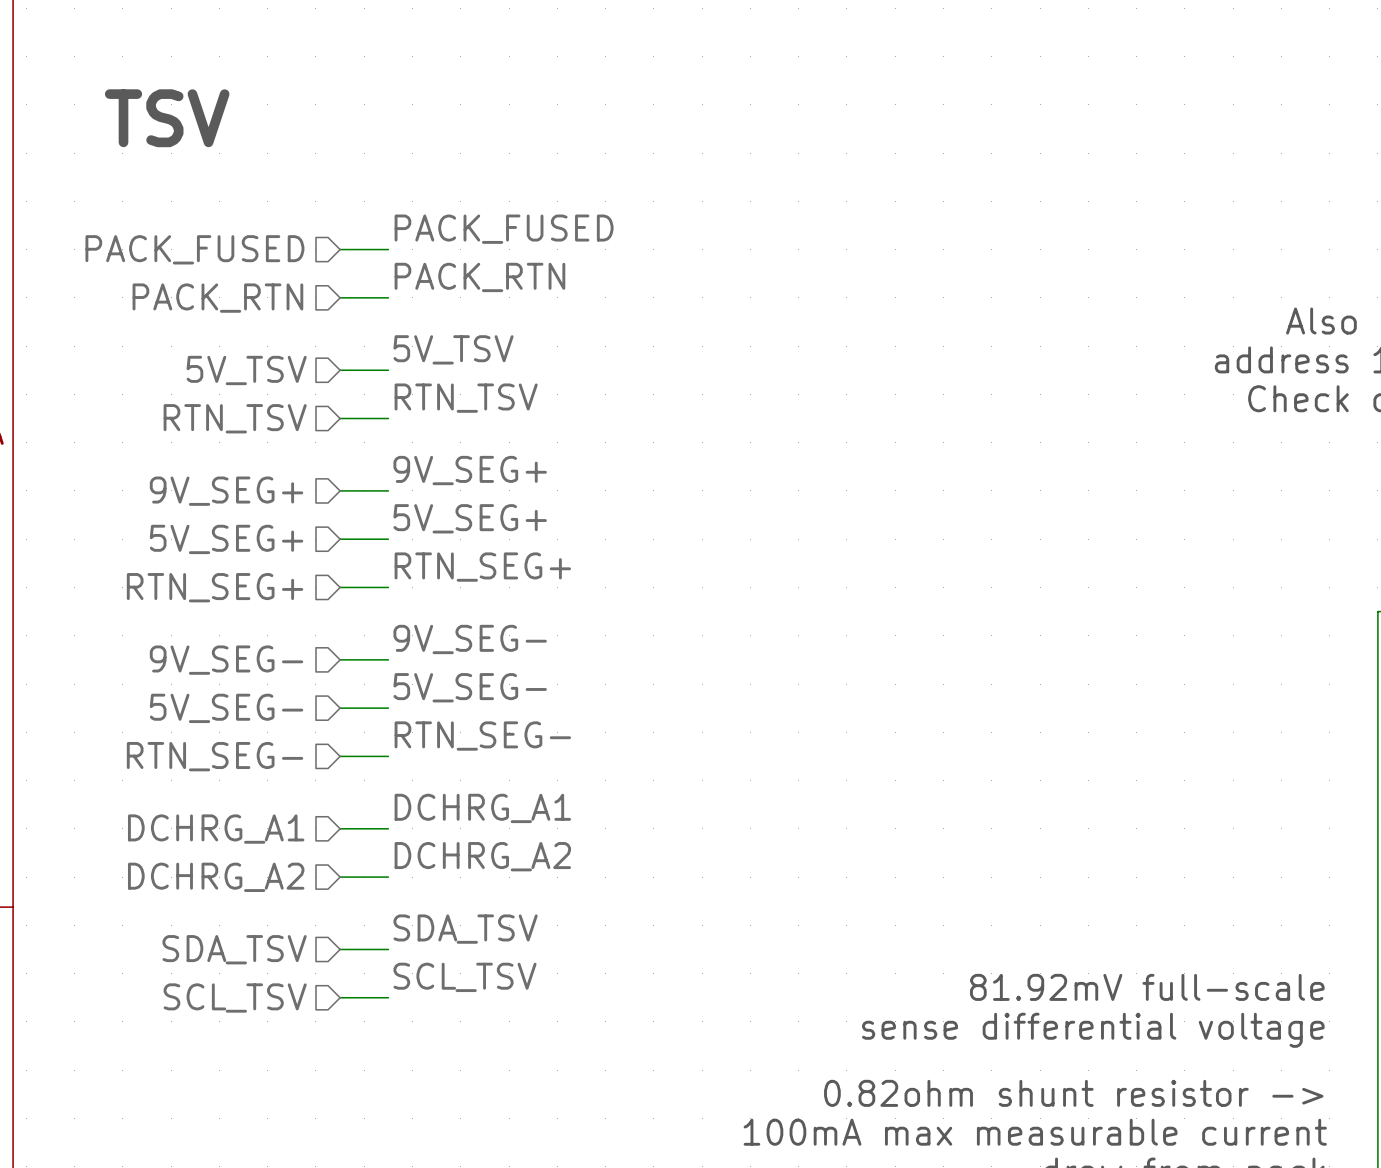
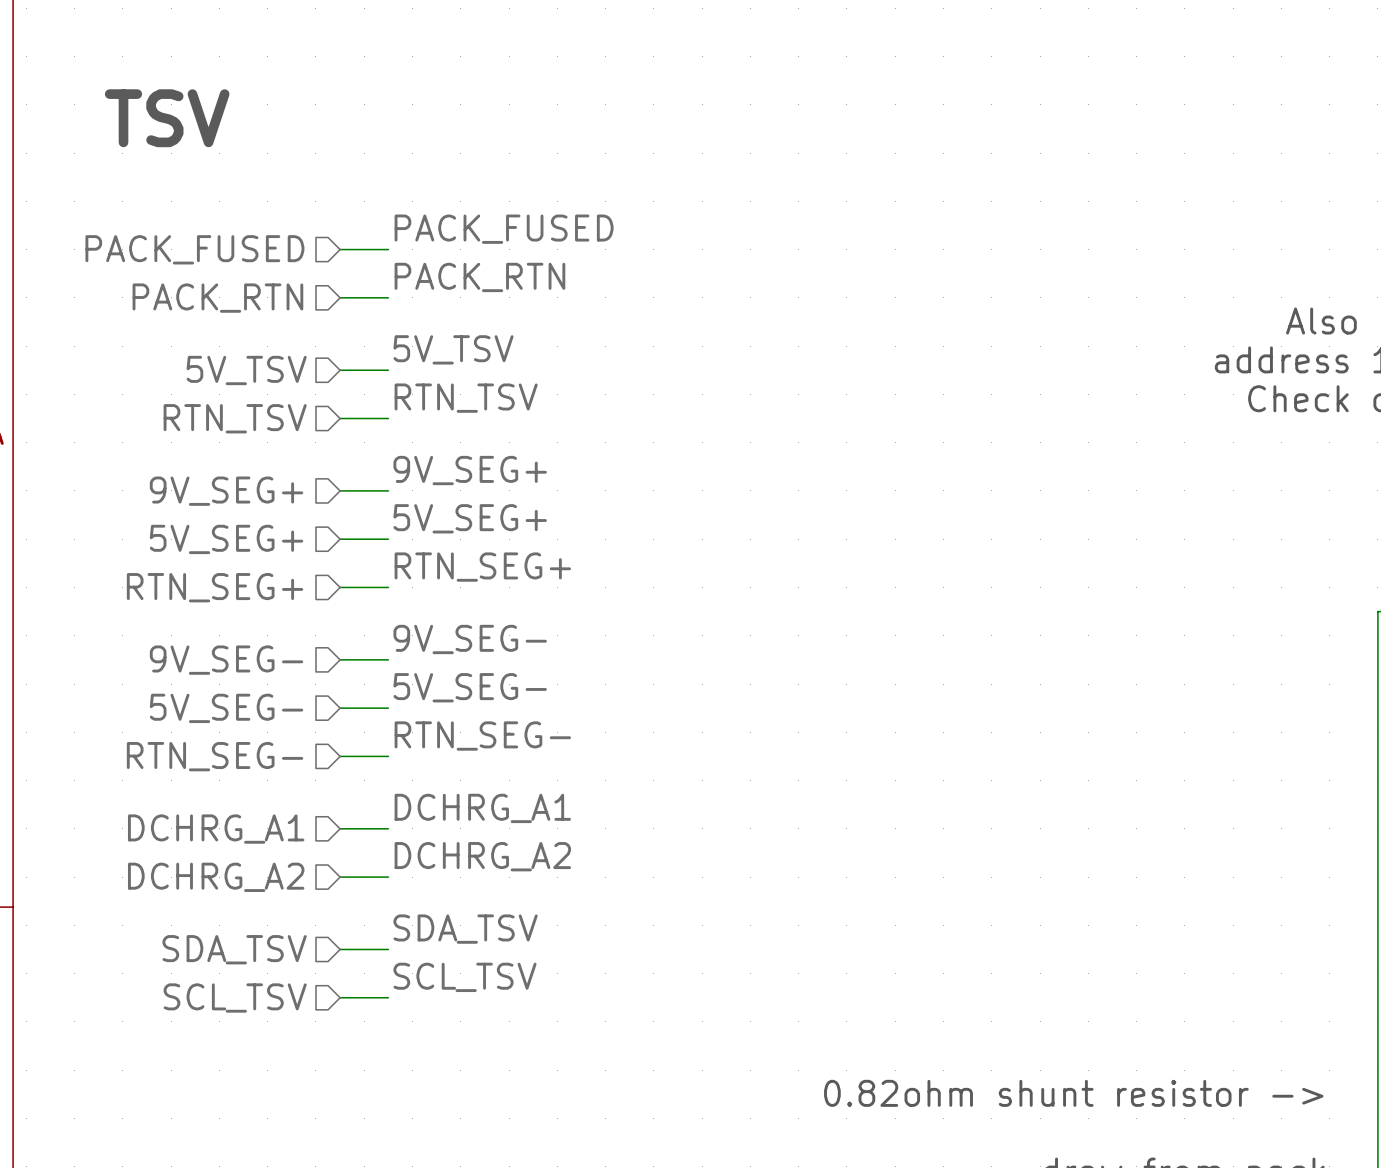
text: 81.92mV full-scale (1147, 987) -> none
text: sense differential voltage (1093, 1030) -> none
text: 100mA max measurable current (1035, 1132) -> none

